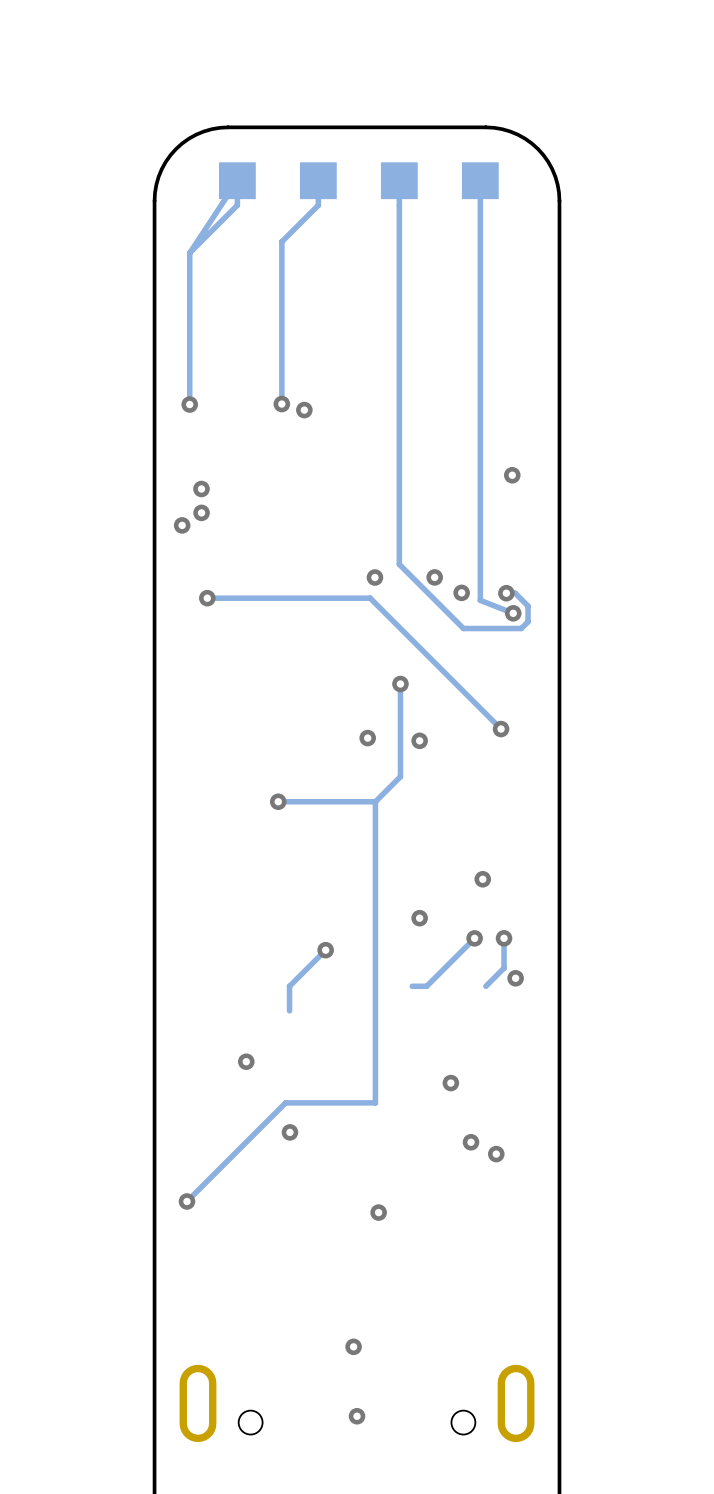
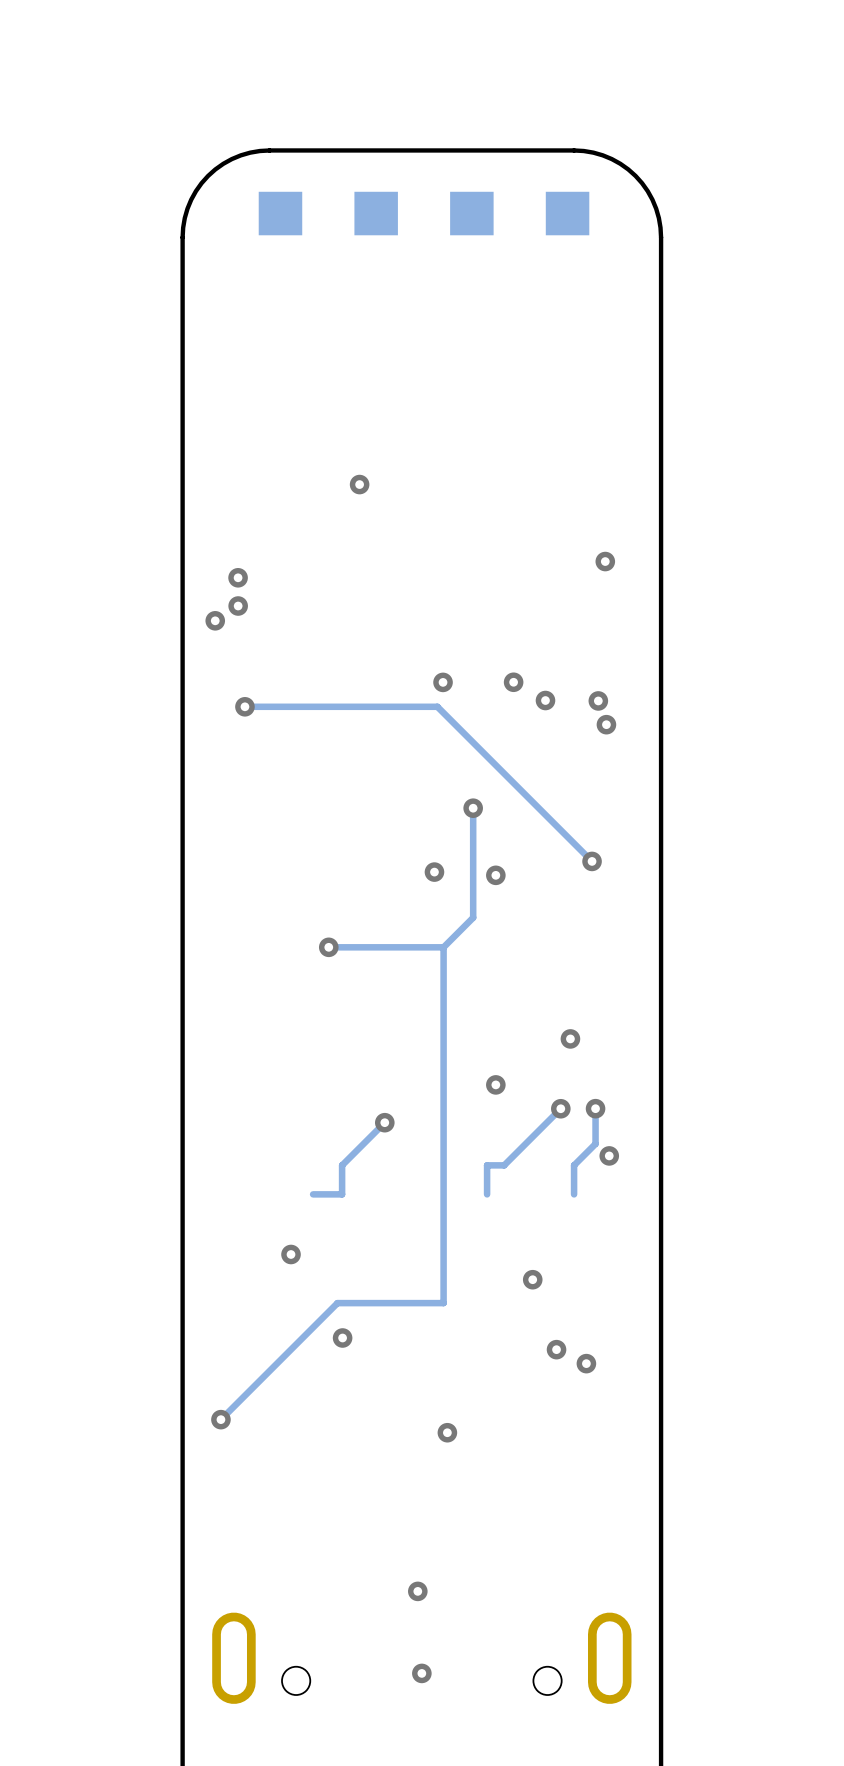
track: (318, 180) (318, 205) (281, 241) (281, 404) -> none
track: (399, 180) (399, 564) (463, 628) (521, 628) (528, 621) (528, 606) (515, 593) (506, 593) -> none
track: (480, 180) (480, 600) (513, 613) -> none
track: (189, 252) (237, 205) (237, 180) (189, 252) -> none
track: (189, 252) (189, 404) -> none
via: (189, 404) -> none
via: (281, 404) -> none
track: none -> (487, 1165) (487, 1194)
track: none -> (574, 1165) (574, 1194)
track: none -> (342, 1194) (313, 1194)

